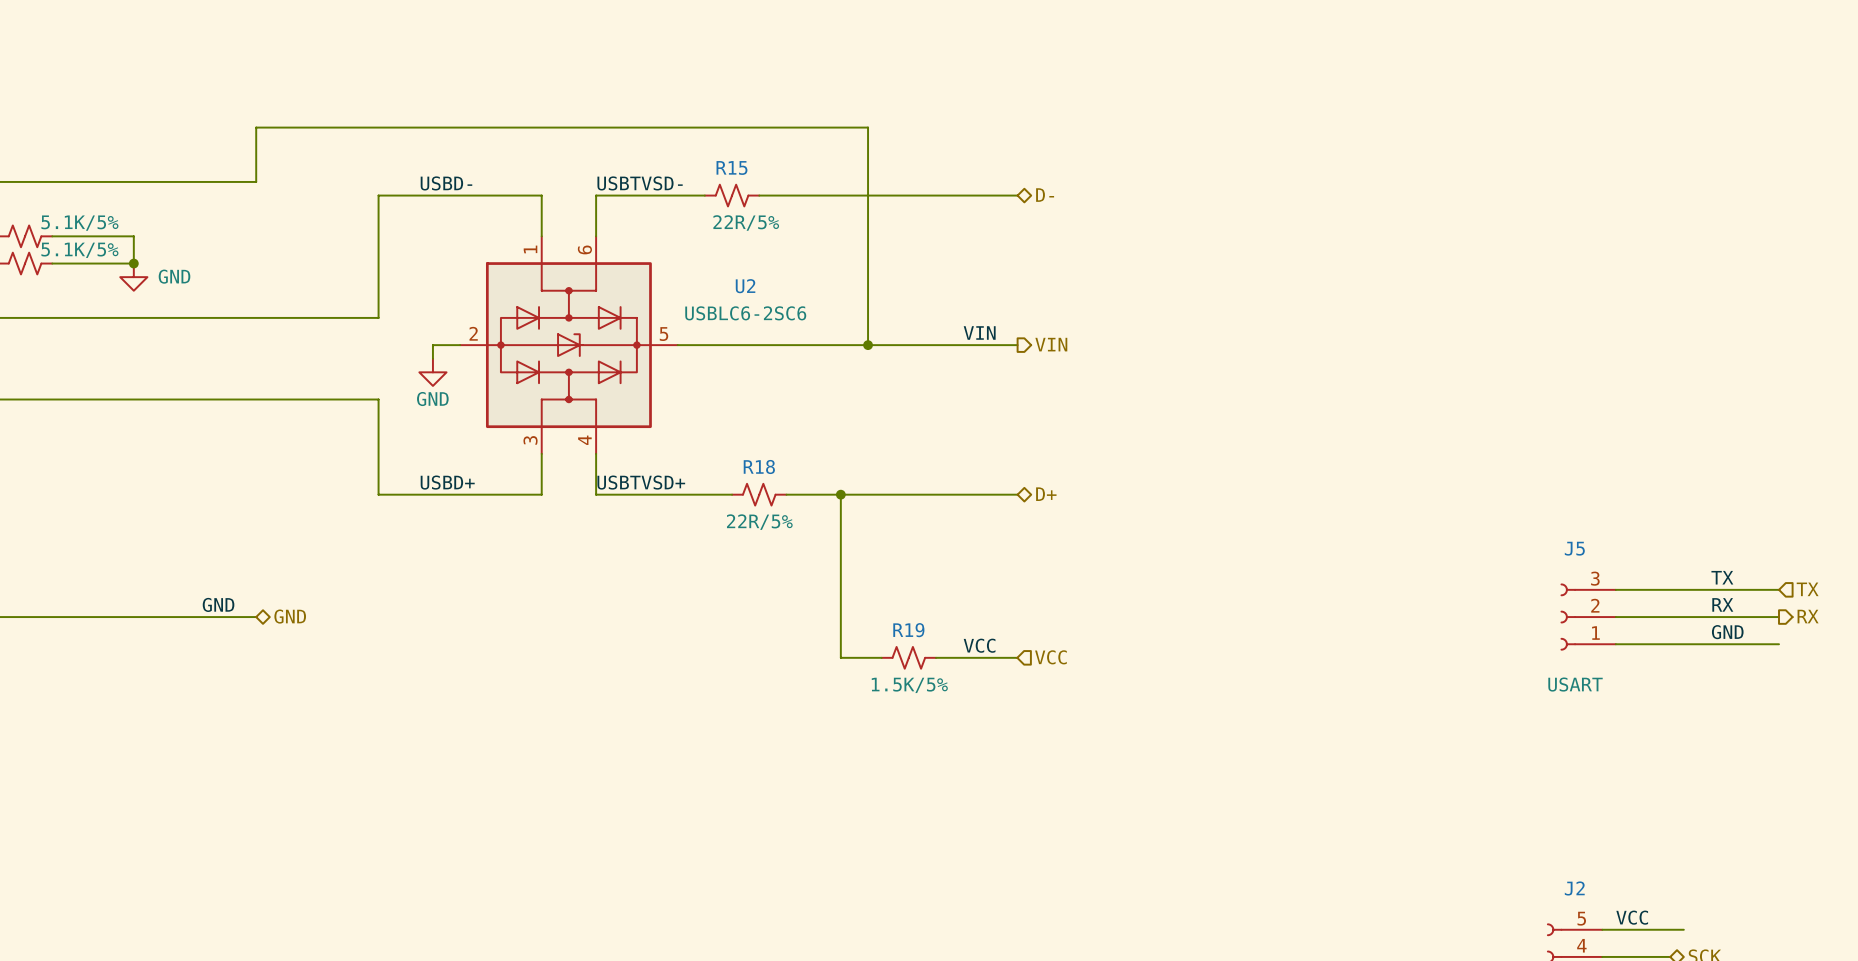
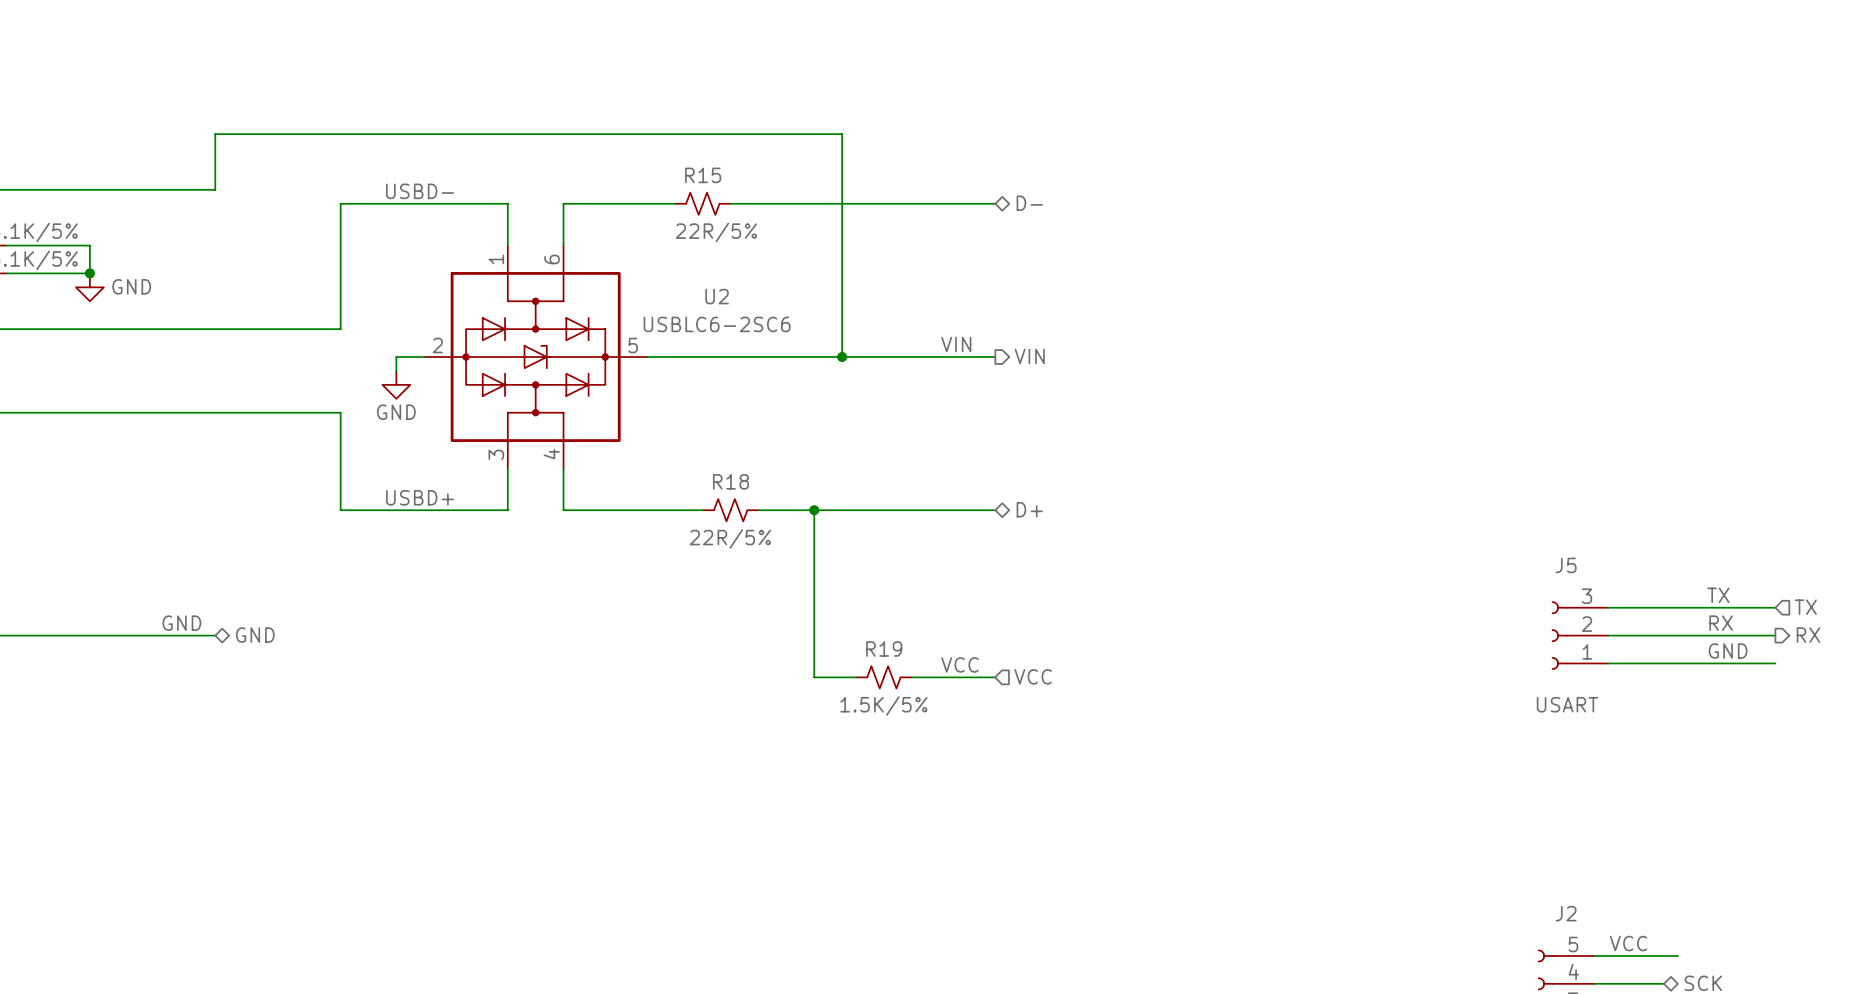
label: USBTVSD- (640, 183) -> none
label: USBTVSD+ (641, 482) -> none

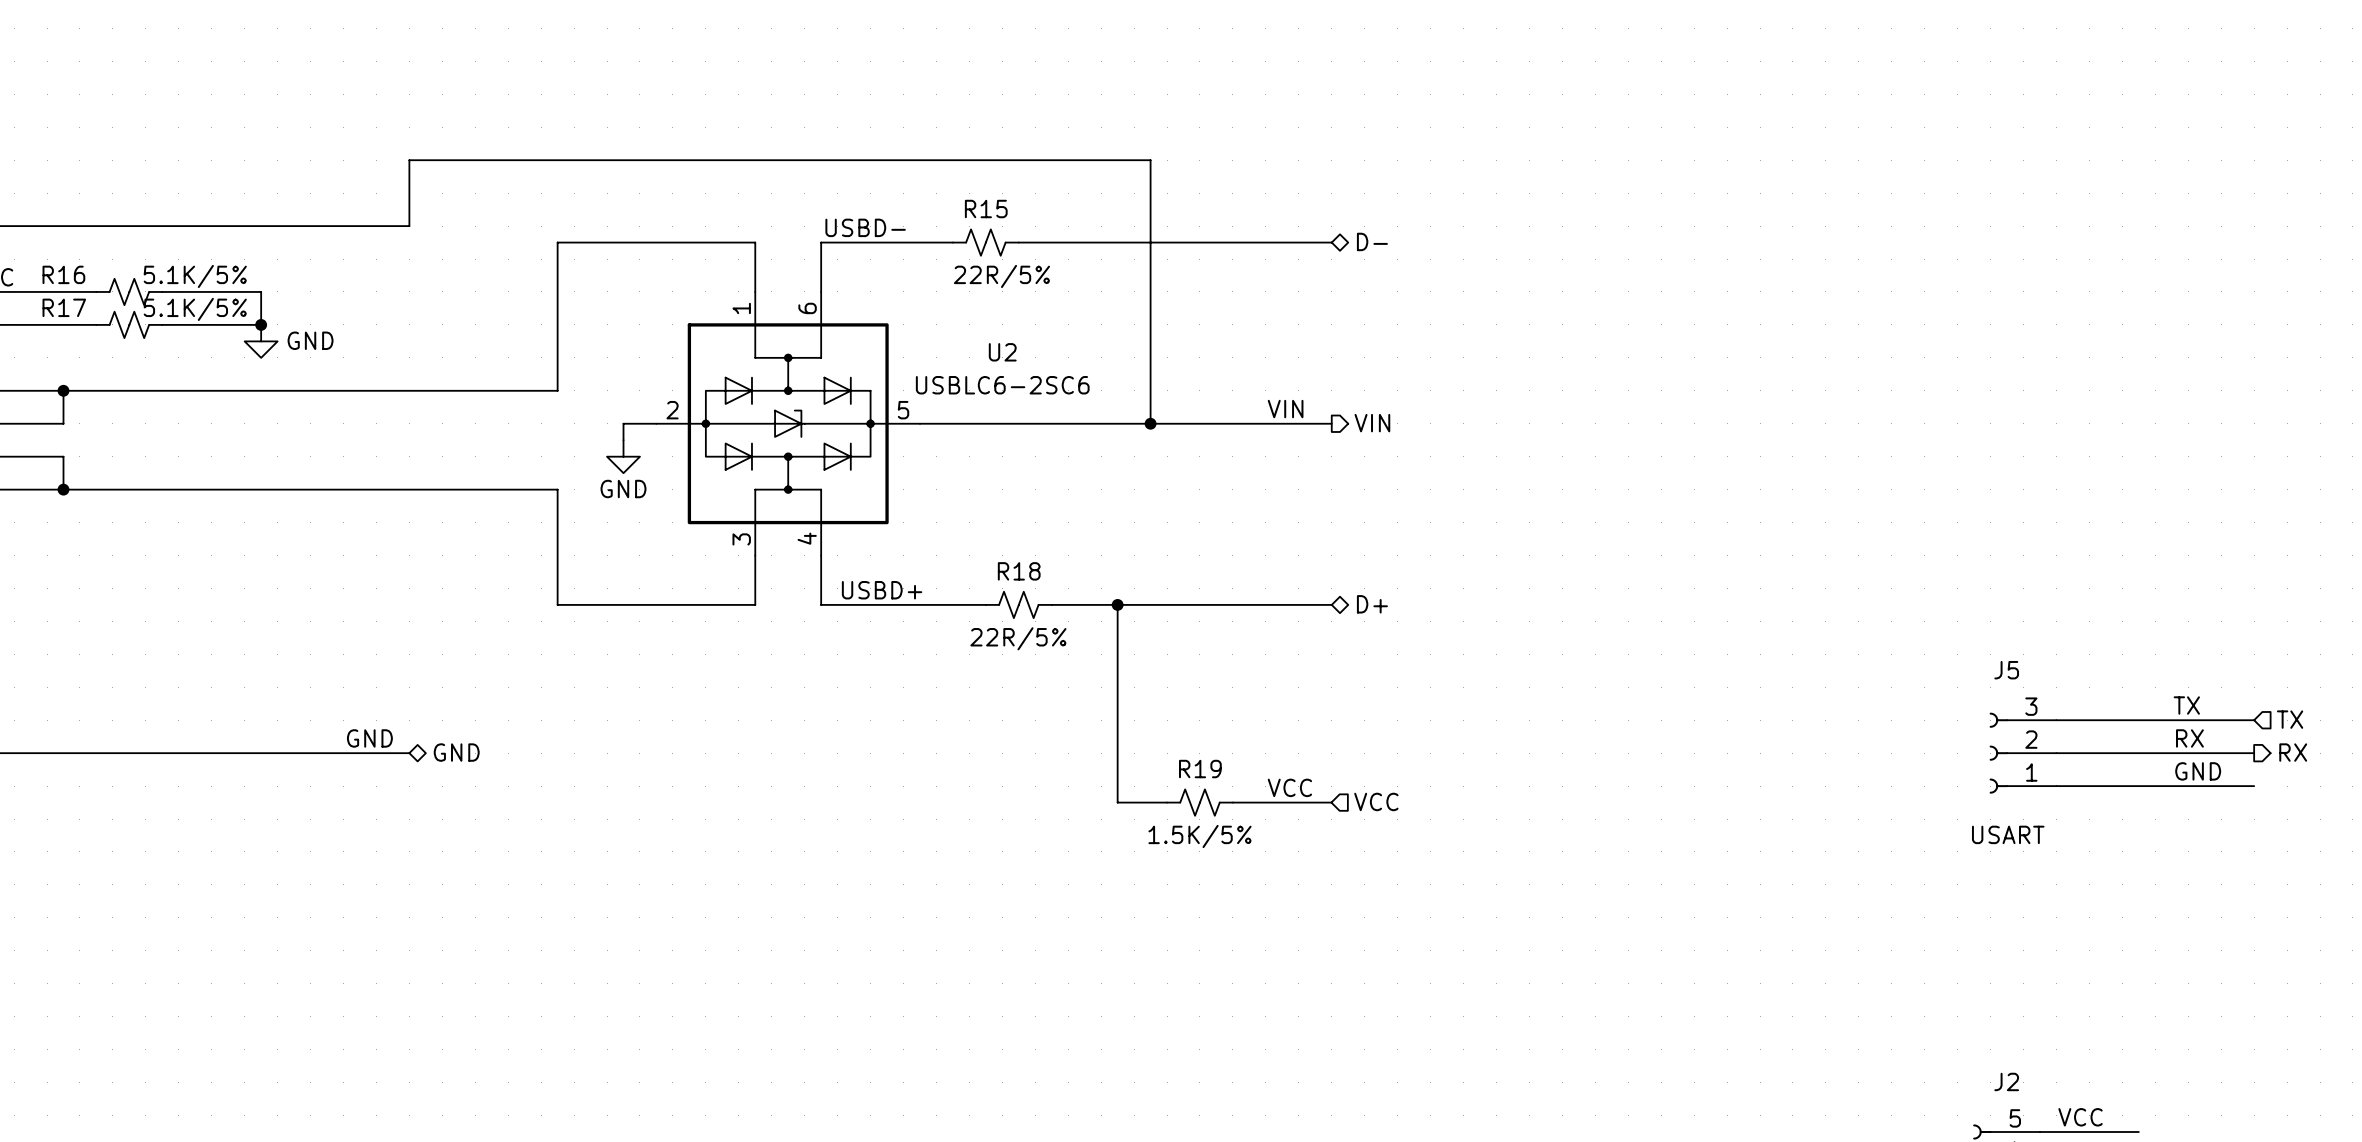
label position: USBD- (420, 191) -> USBD- (865, 227)
label position: USBD+ (420, 497) -> USBD+ (882, 590)

